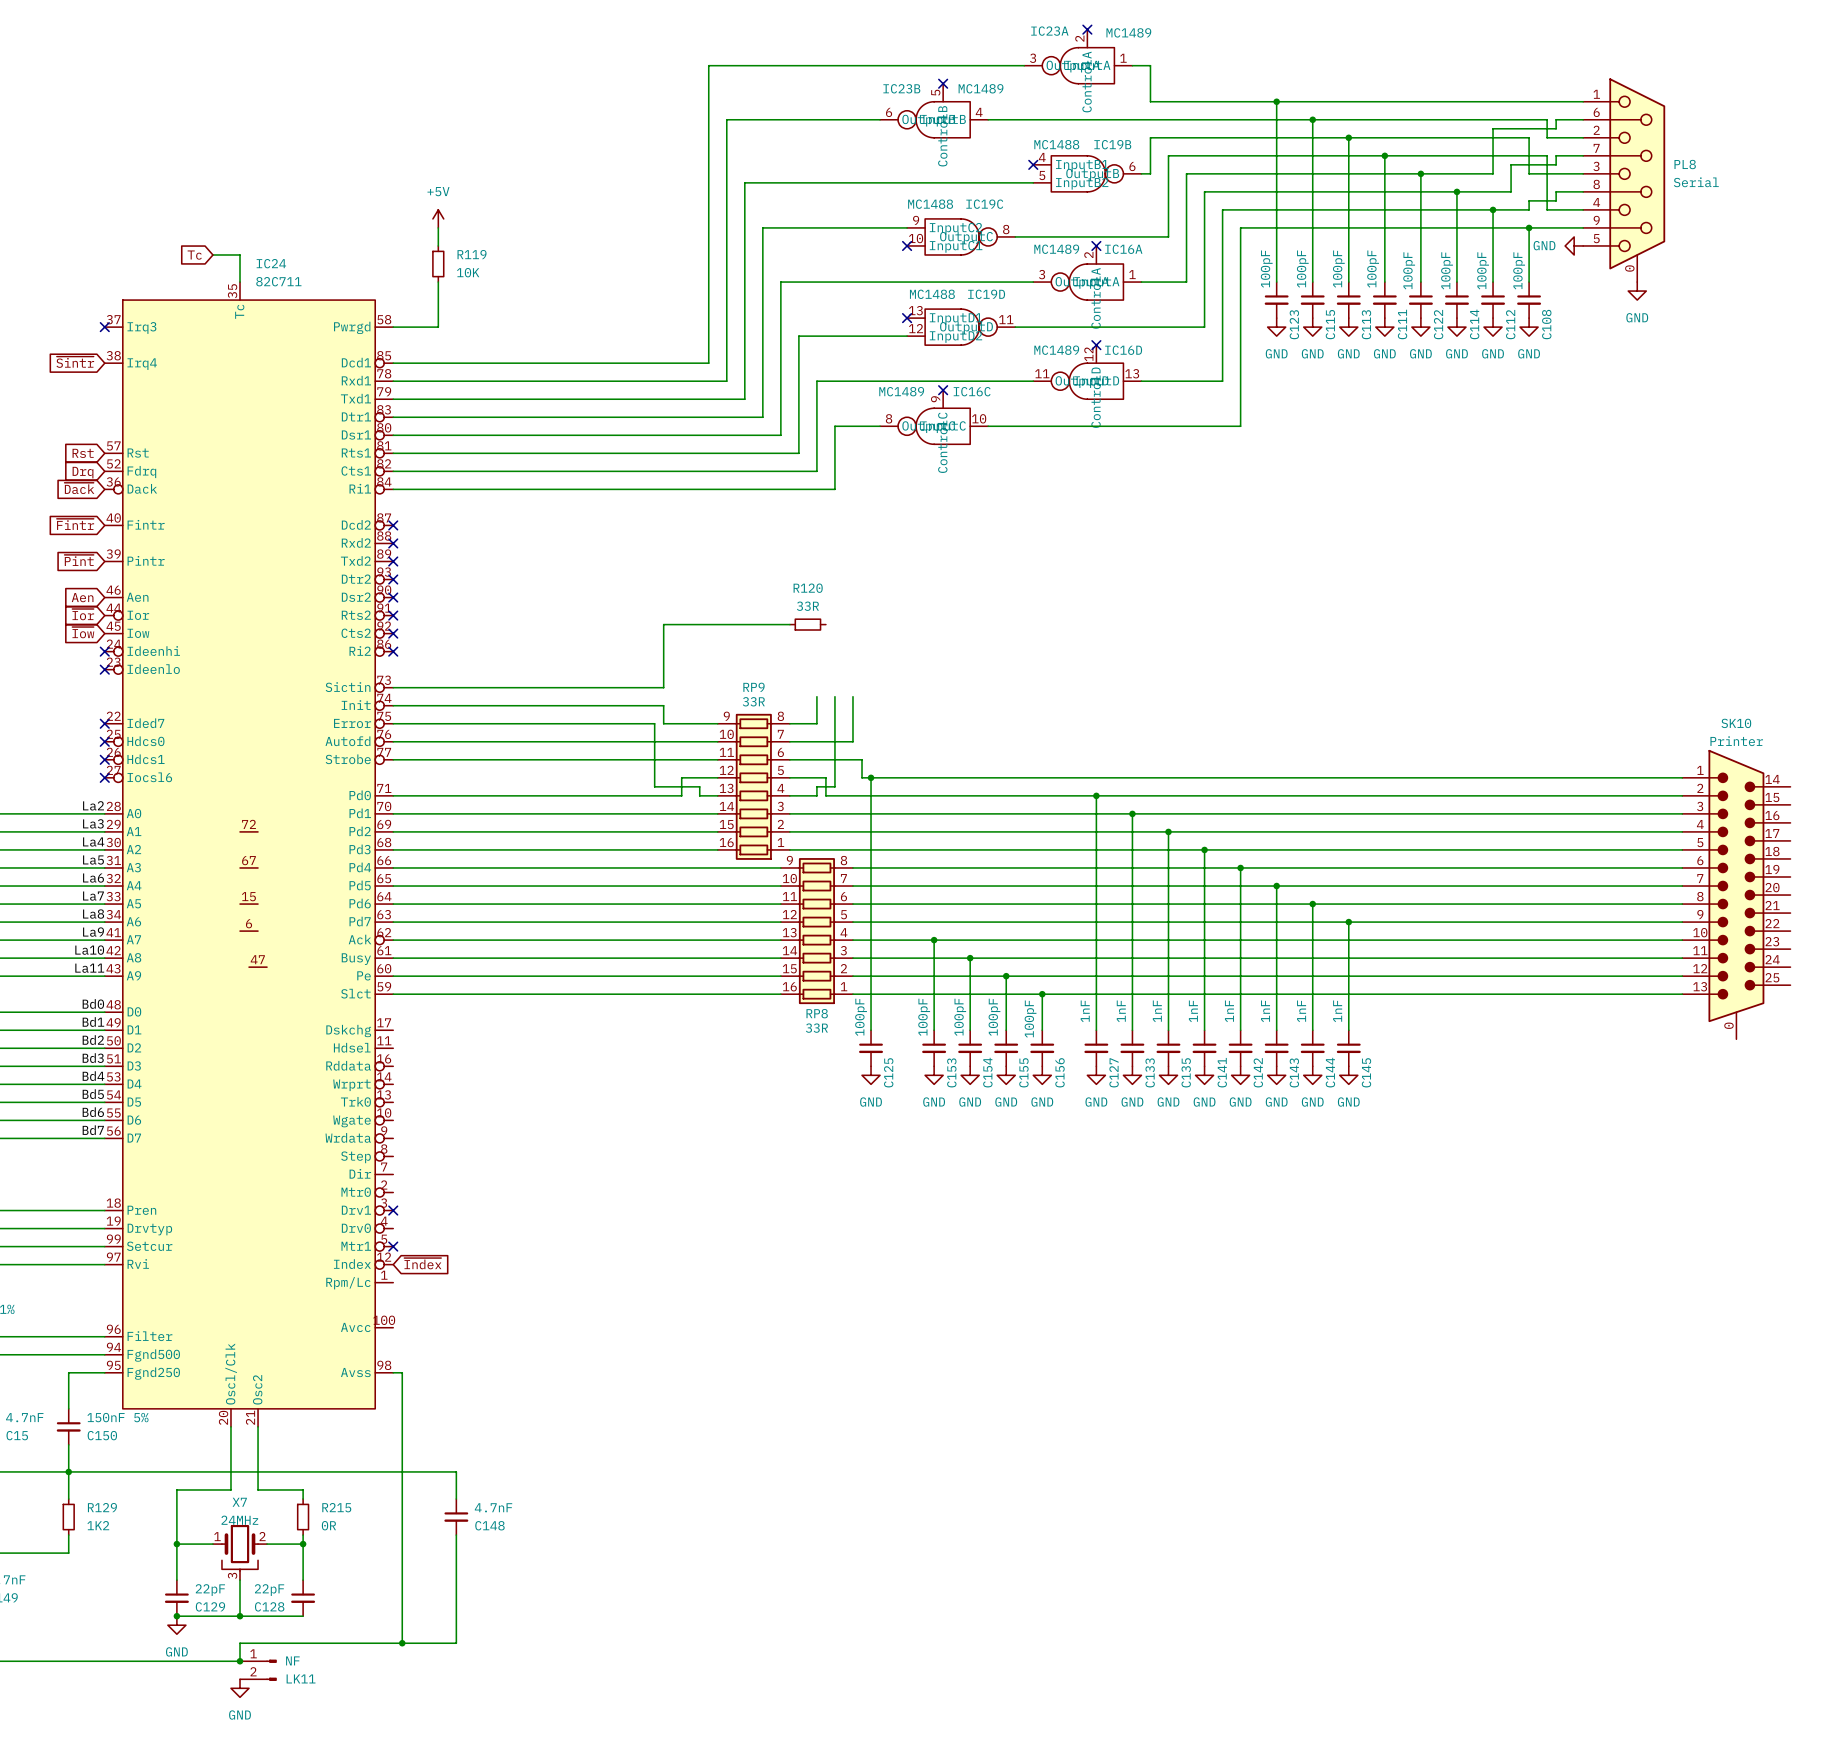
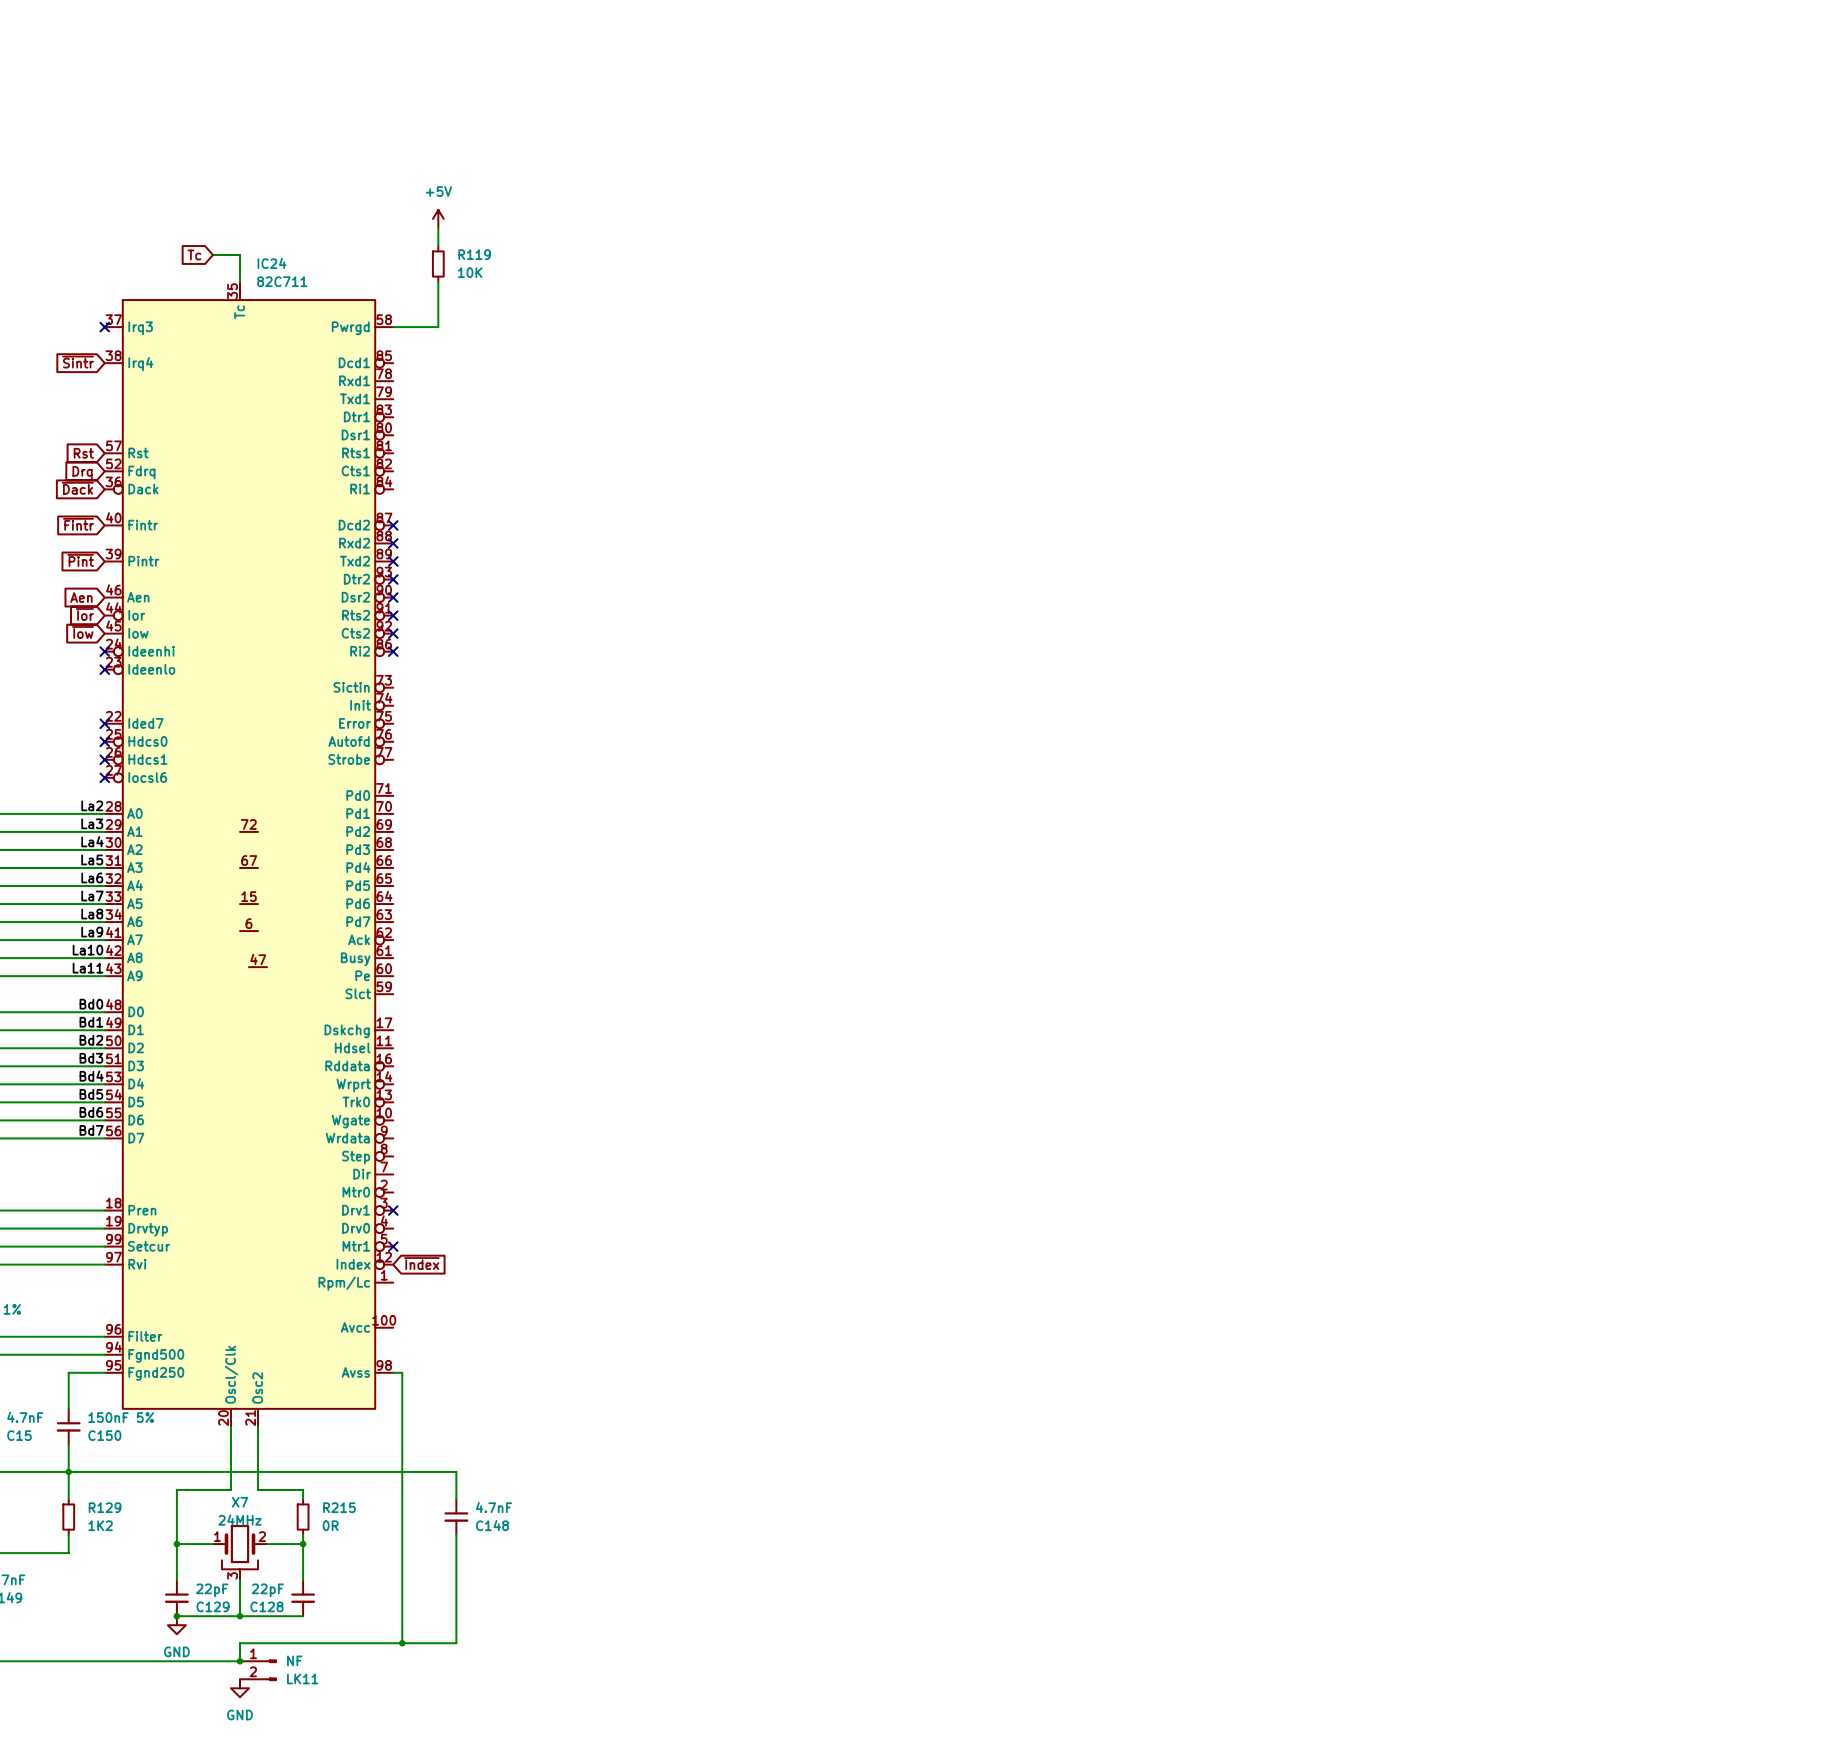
no-connect mark: (1087, 29) -> none
IC23A: MC1489 (1078, 56) -> none
wire: (1024, 65) (708, 65) (708, 363) (393, 363) -> none
wire: (1132, 65) (1150, 65) (1150, 101) (1583, 101) -> none
no-connect mark: (943, 83) -> none
wire: (1276, 101) (1276, 282) -> none
junction: (1276, 101) -> none
IC23B: MC1489 (934, 110) -> none
wire: (880, 119) (726, 119) (726, 381) (393, 381) -> none
wire: (988, 119) (1547, 119) (1547, 137) (1583, 137) -> none
wire: (1312, 119) (1312, 282) -> none
junction: (1312, 119) -> none
wire: (1583, 119) (1556, 119) (1556, 128) (1493, 128) (1493, 173) (1186, 173) (1186, 282) (1141, 282) -> none
wire: (1348, 137) (1348, 282) -> none
junction: (1348, 137) -> none
wire: (1384, 155) (1384, 282) -> none
junction: (1384, 155) -> none
wire: (1583, 155) (1556, 155) (1556, 164) (1511, 164) (1511, 191) (1204, 191) (1204, 327) (1015, 327) -> none
no-connect mark: (1033, 164) -> none
IC19B: MC1488 (1087, 173) -> none
wire: (1141, 173) (1150, 173) (1150, 137) (1529, 137) (1529, 173) (1583, 173) -> none
wire: (1420, 173) (1420, 282) -> none
junction: (1420, 173) -> none
PL8: Serial (1624, 180) -> none
wire: (1033, 182) (744, 182) (744, 399) (393, 399) -> none
wire: (1456, 191) (1456, 282) -> none
junction: (1456, 191) -> none
wire: (1583, 191) (1556, 191) (1556, 200) (1529, 200) (1529, 209) (1222, 209) (1222, 381) (1141, 381) -> none
wire: (1493, 209) (1493, 282) -> none
junction: (1493, 209) -> none
wire: (1583, 209) (1547, 209) (1547, 155) (1168, 155) (1168, 236) (1015, 236) -> none
wire: (907, 227) (762, 227) (762, 417) (393, 417) -> none
wire: (1529, 227) (1529, 282) -> none
junction: (1529, 227) -> none
wire: (1583, 227) (1240, 227) (1240, 426) (988, 426) -> none
IC19C: MC1488 (961, 236) -> none
no-connect mark: (907, 245) -> none
no-connect mark: (1096, 245) -> none
power symbol: GND (1574, 245) -> none
IC16A: MC1489 (1087, 273) -> none
wire: (1033, 282) (780, 282) (780, 435) (393, 435) -> none
power symbol: GND (1637, 291) -> none
C123: 100pF (1276, 300) -> none
C115: 100pF (1312, 300) -> none
C113: 100pF (1348, 300) -> none
C111: 100pF (1384, 300) -> none
C122: 100pF (1420, 300) -> none
C114: 100pF (1456, 300) -> none
C112: 100pF (1493, 300) -> none
C108: 100pF (1529, 300) -> none
no-connect mark: (907, 318) -> none
IC19D: MC1488 (961, 327) -> none
power symbol: GND (1276, 327) -> none
power symbol: GND (1312, 327) -> none
power symbol: GND (1348, 327) -> none
power symbol: GND (1384, 327) -> none
power symbol: GND (1420, 327) -> none
power symbol: GND (1456, 327) -> none
power symbol: GND (1493, 327) -> none
power symbol: GND (1529, 327) -> none
wire: (907, 336) (798, 336) (798, 453) (393, 453) -> none
no-connect mark: (1096, 345) -> none
IC16D: MC1489 (1087, 372) -> none
wire: (1033, 381) (816, 381) (816, 471) (393, 471) -> none
no-connect mark: (943, 390) -> none
IC16C: MC1489 (934, 417) -> none
wire: (880, 426) (834, 426) (834, 489) (393, 489) -> none
wire: (789, 624) (663, 624) (663, 687) (393, 687) -> none
R120: 33R (807, 624) -> none
wire: (816, 696) (816, 723) (789, 723) -> none
wire: (834, 696) (834, 786) (816, 786) (816, 795) (789, 795) -> none
wire: (852, 696) (852, 741) (789, 741) -> none
wire: (393, 705) (663, 705) (663, 723) (717, 723) -> none
wire: (393, 723) (654, 723) (654, 786) (699, 786) (699, 795) (717, 795) -> none
wire: (393, 741) (717, 741) -> none
wire: (393, 759) (717, 759) -> none
wire: (789, 759) (862, 759) (862, 777) (1682, 777) -> none
wire: (717, 777) (681, 777) (681, 795) (393, 795) -> none
wire: (789, 777) (825, 777) (825, 795) (1682, 795) -> none
wire: (871, 777) (871, 1030) -> none
junction: (871, 777) -> none
RP9: 33R (753, 786) -> none
wire: (1096, 795) (1096, 1030) -> none
junction: (1096, 795) -> none
wire: (393, 813) (717, 813) -> none
wire: (789, 813) (1682, 813) -> none
wire: (1132, 813) (1132, 1030) -> none
junction: (1132, 813) -> none
wire: (393, 831) (717, 831) -> none
wire: (789, 831) (1682, 831) -> none
wire: (1168, 831) (1168, 1030) -> none
junction: (1168, 831) -> none
wire: (393, 849) (717, 849) -> none
wire: (789, 849) (1682, 849) -> none
wire: (1204, 849) (1204, 1030) -> none
junction: (1204, 849) -> none
wire: (393, 867) (780, 867) -> none
wire: (852, 867) (1682, 867) -> none
wire: (1240, 867) (1240, 1030) -> none
junction: (1240, 867) -> none
wire: (393, 886) (780, 886) -> none
wire: (852, 886) (1682, 886) -> none
wire: (1276, 886) (1276, 1030) -> none
junction: (1276, 886) -> none
SK10: Printer (1736, 894) -> none
wire: (393, 904) (780, 904) -> none
wire: (852, 904) (1682, 904) -> none
wire: (1312, 904) (1312, 1030) -> none
junction: (1312, 904) -> none
wire: (393, 922) (780, 922) -> none
wire: (852, 922) (1682, 922) -> none
wire: (1348, 922) (1348, 1030) -> none
junction: (1348, 922) -> none
RP8: 33R (816, 931) -> none
wire: (393, 940) (780, 940) -> none
wire: (852, 940) (1682, 940) -> none
wire: (934, 940) (934, 1030) -> none
junction: (934, 940) -> none
wire: (393, 958) (780, 958) -> none
wire: (852, 958) (1682, 958) -> none
wire: (970, 958) (970, 1030) -> none
junction: (970, 958) -> none
wire: (393, 976) (780, 976) -> none
wire: (852, 976) (1682, 976) -> none
wire: (1006, 976) (1006, 1030) -> none
junction: (1006, 976) -> none
wire: (393, 994) (780, 994) -> none
wire: (852, 994) (1682, 994) -> none
wire: (1042, 994) (1042, 1030) -> none
junction: (1042, 994) -> none
C125: 100pF (871, 1048) -> none
C153: 100pF (934, 1048) -> none
C154: 100pF (970, 1048) -> none
C155: 100pF (1006, 1048) -> none
C156: 100pF (1042, 1048) -> none
C127: 1nF (1096, 1048) -> none
C133: 1nF (1132, 1048) -> none
C135: 1nF (1168, 1048) -> none
C141: 1nF (1204, 1048) -> none
C142: 1nF (1240, 1048) -> none
C143: 1nF (1276, 1048) -> none
C144: 1nF (1312, 1048) -> none
C145: 1nF (1348, 1048) -> none
power symbol: GND (871, 1075) -> none
power symbol: GND (934, 1075) -> none
power symbol: GND (970, 1075) -> none
power symbol: GND (1006, 1075) -> none
power symbol: GND (1042, 1075) -> none
power symbol: GND (1096, 1075) -> none
power symbol: GND (1132, 1075) -> none
power symbol: GND (1168, 1075) -> none
power symbol: GND (1204, 1075) -> none
power symbol: GND (1240, 1075) -> none
power symbol: GND (1276, 1075) -> none
power symbol: GND (1312, 1075) -> none
power symbol: GND (1348, 1075) -> none

